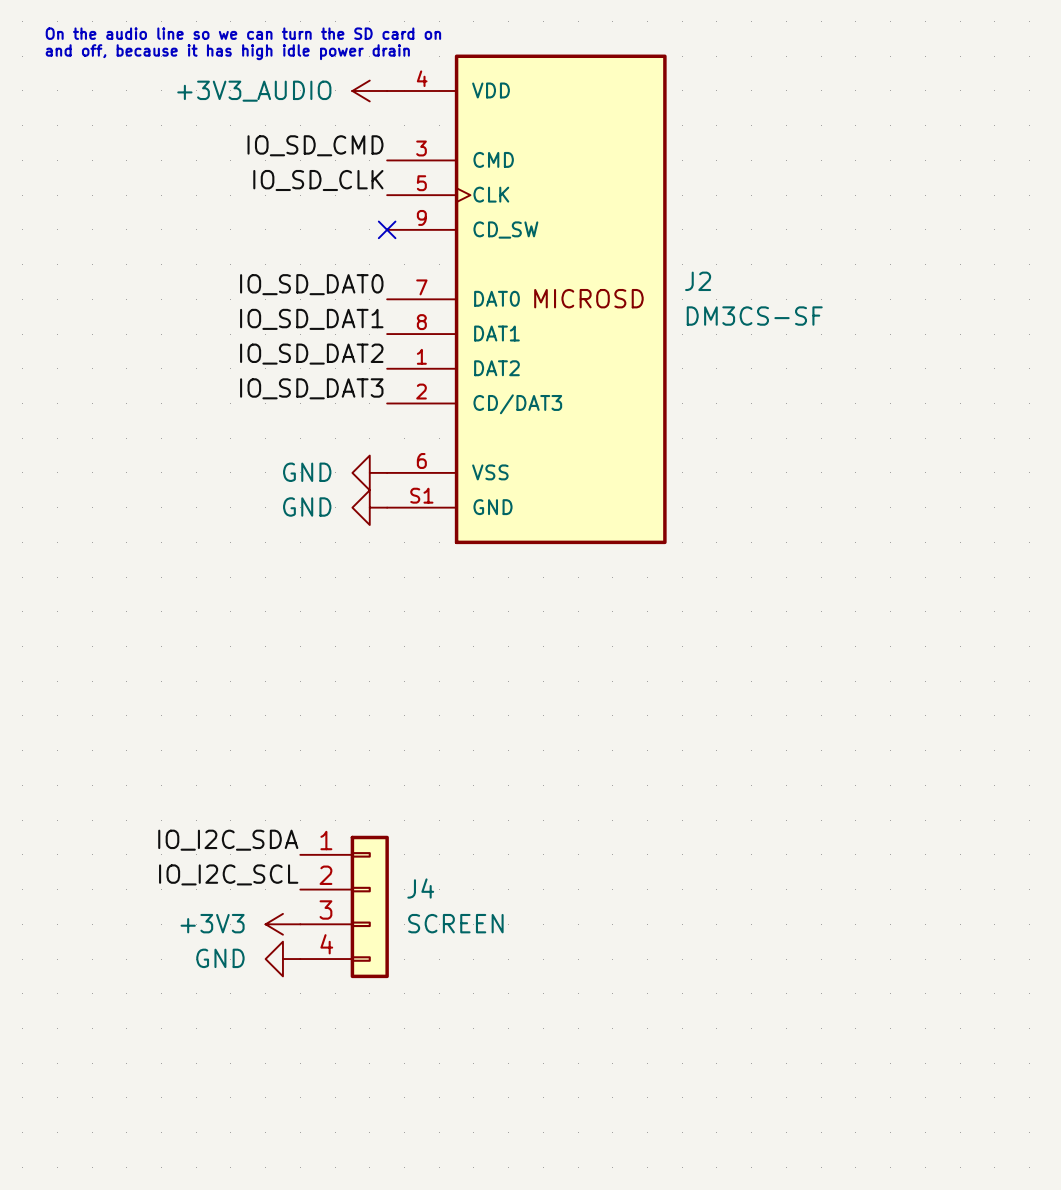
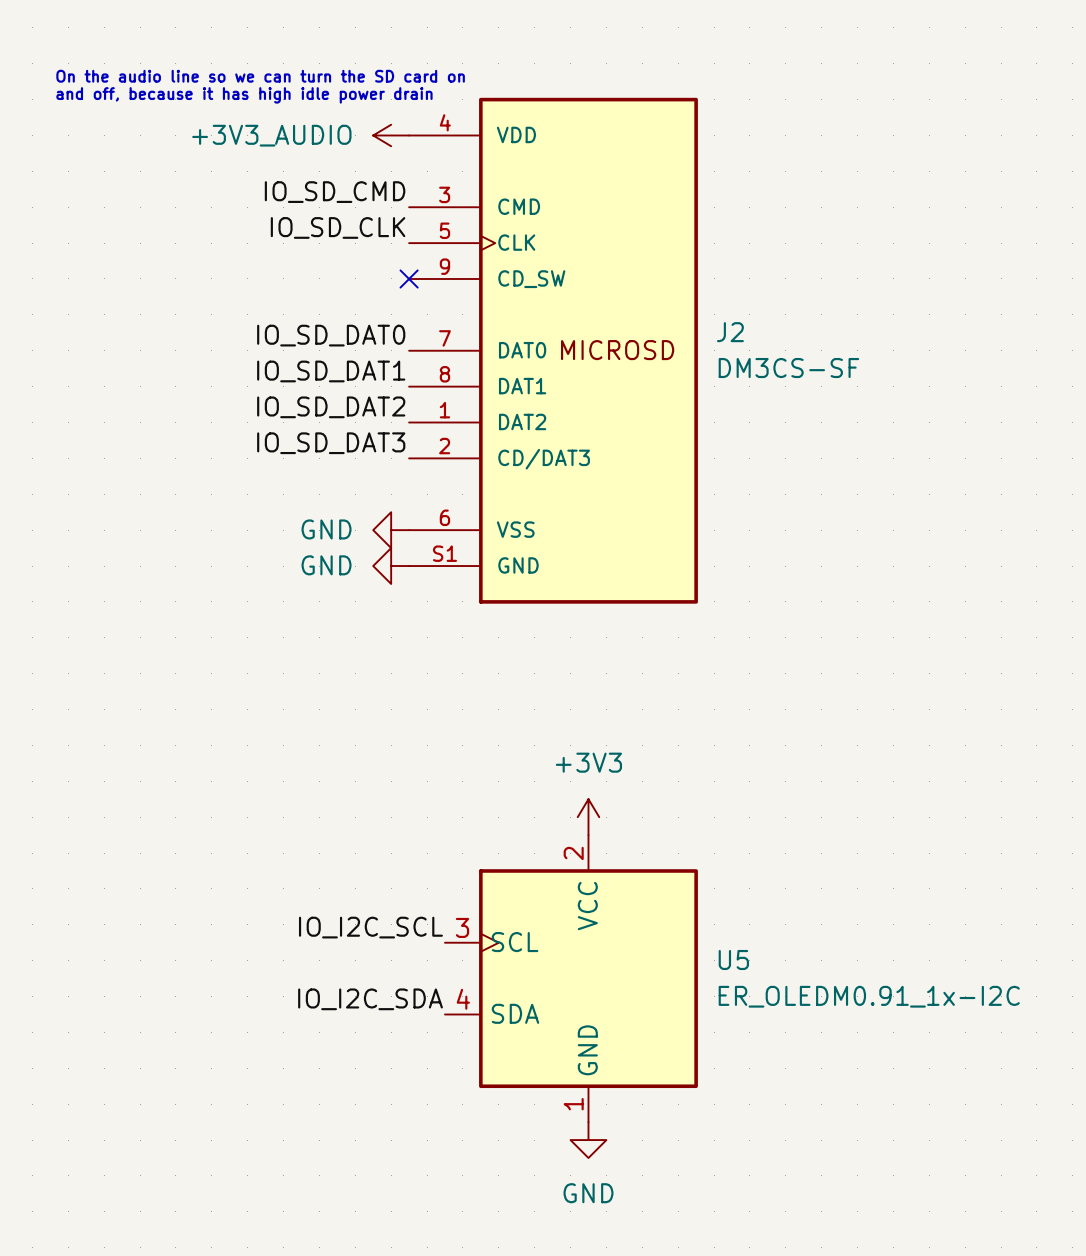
label position: IO_I2C_SDA (228, 840) -> IO_I2C_SDA (370, 999)
label position: IO_I2C_SCL (228, 874) -> IO_I2C_SCL (370, 927)
J4: SCREEN (344, 906) -> none
U5: none -> ER_OLEDM0.91_1x-I2C (571, 978)
power symbol rotation: 0° (282, 924) -> 90° clockwise (588, 817)
power symbol position: +3V3 (282, 924) -> +3V3 (588, 817)
power symbol rotation: 0° (282, 959) -> 90° counterclockwise (588, 1140)
power symbol position: GND (282, 959) -> GND (588, 1140)

